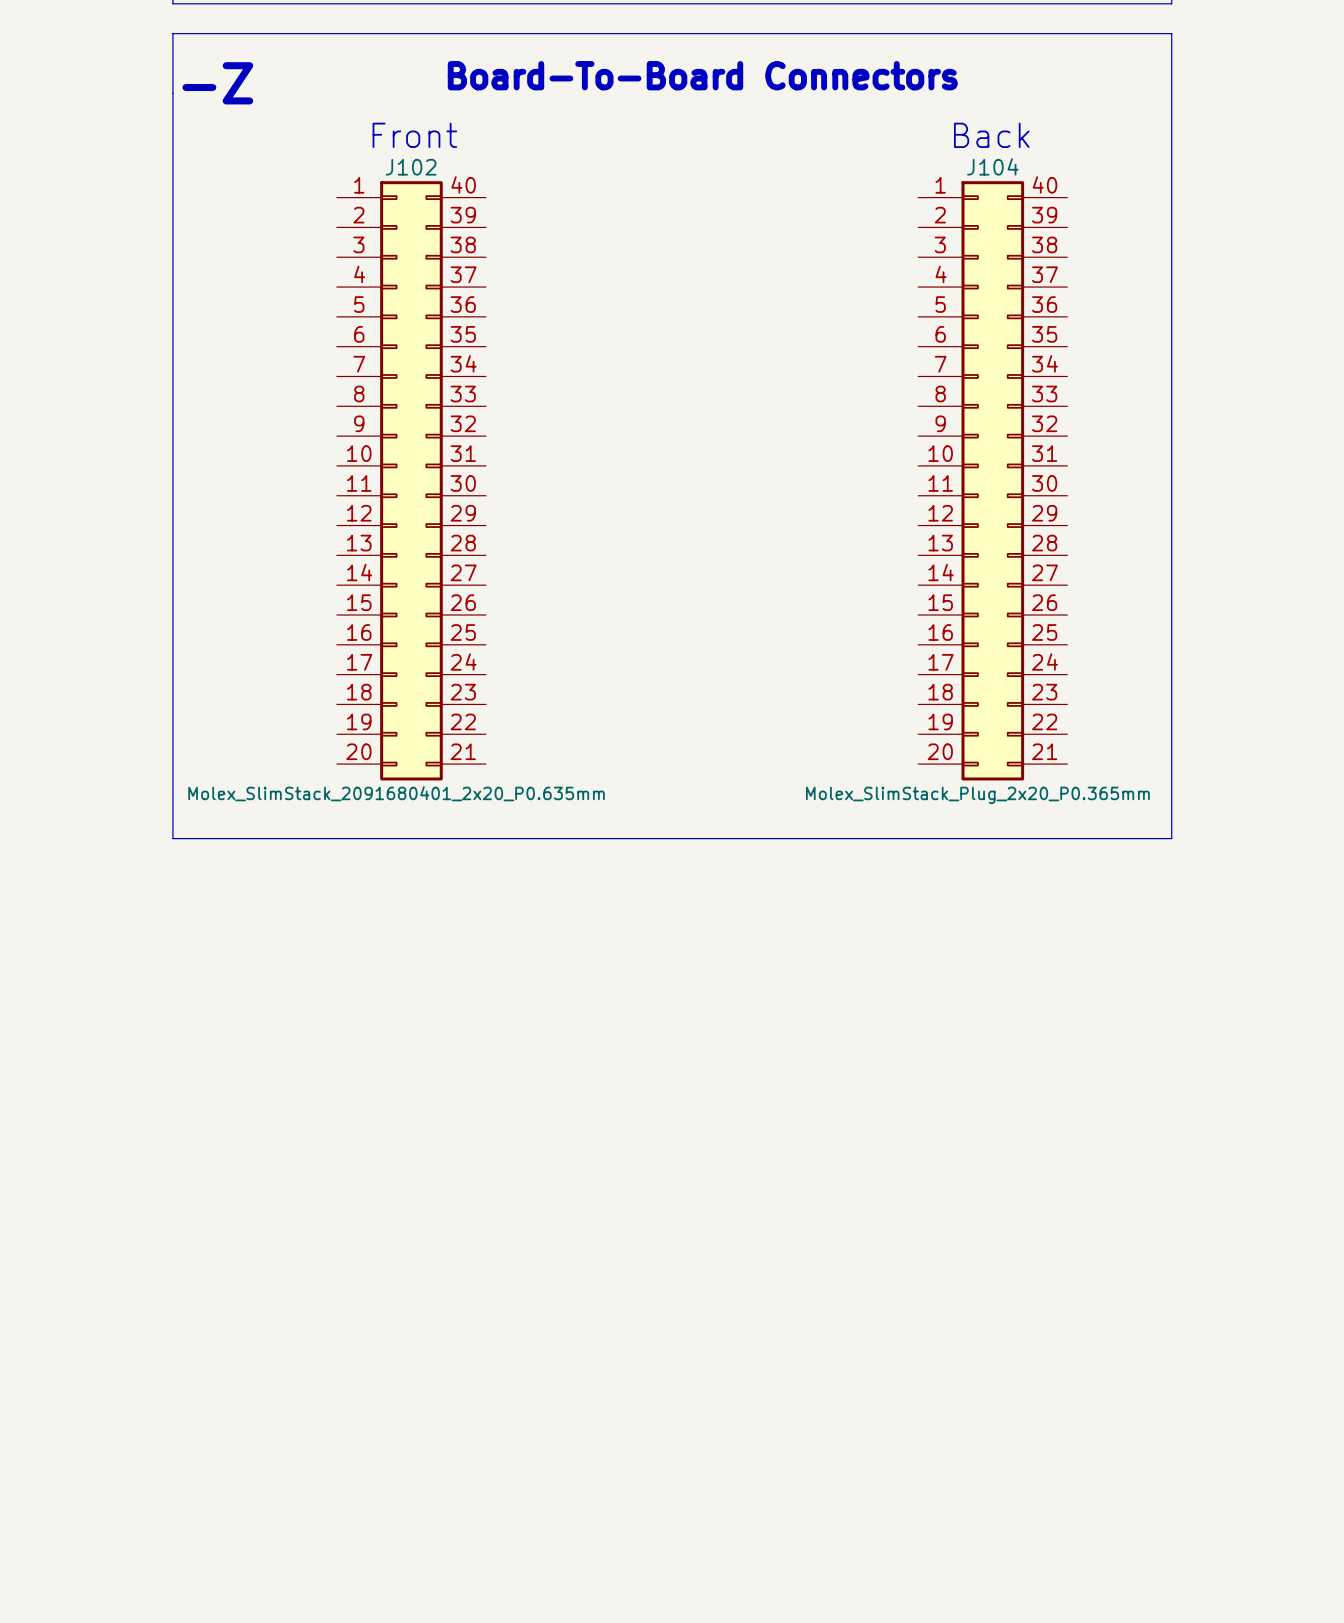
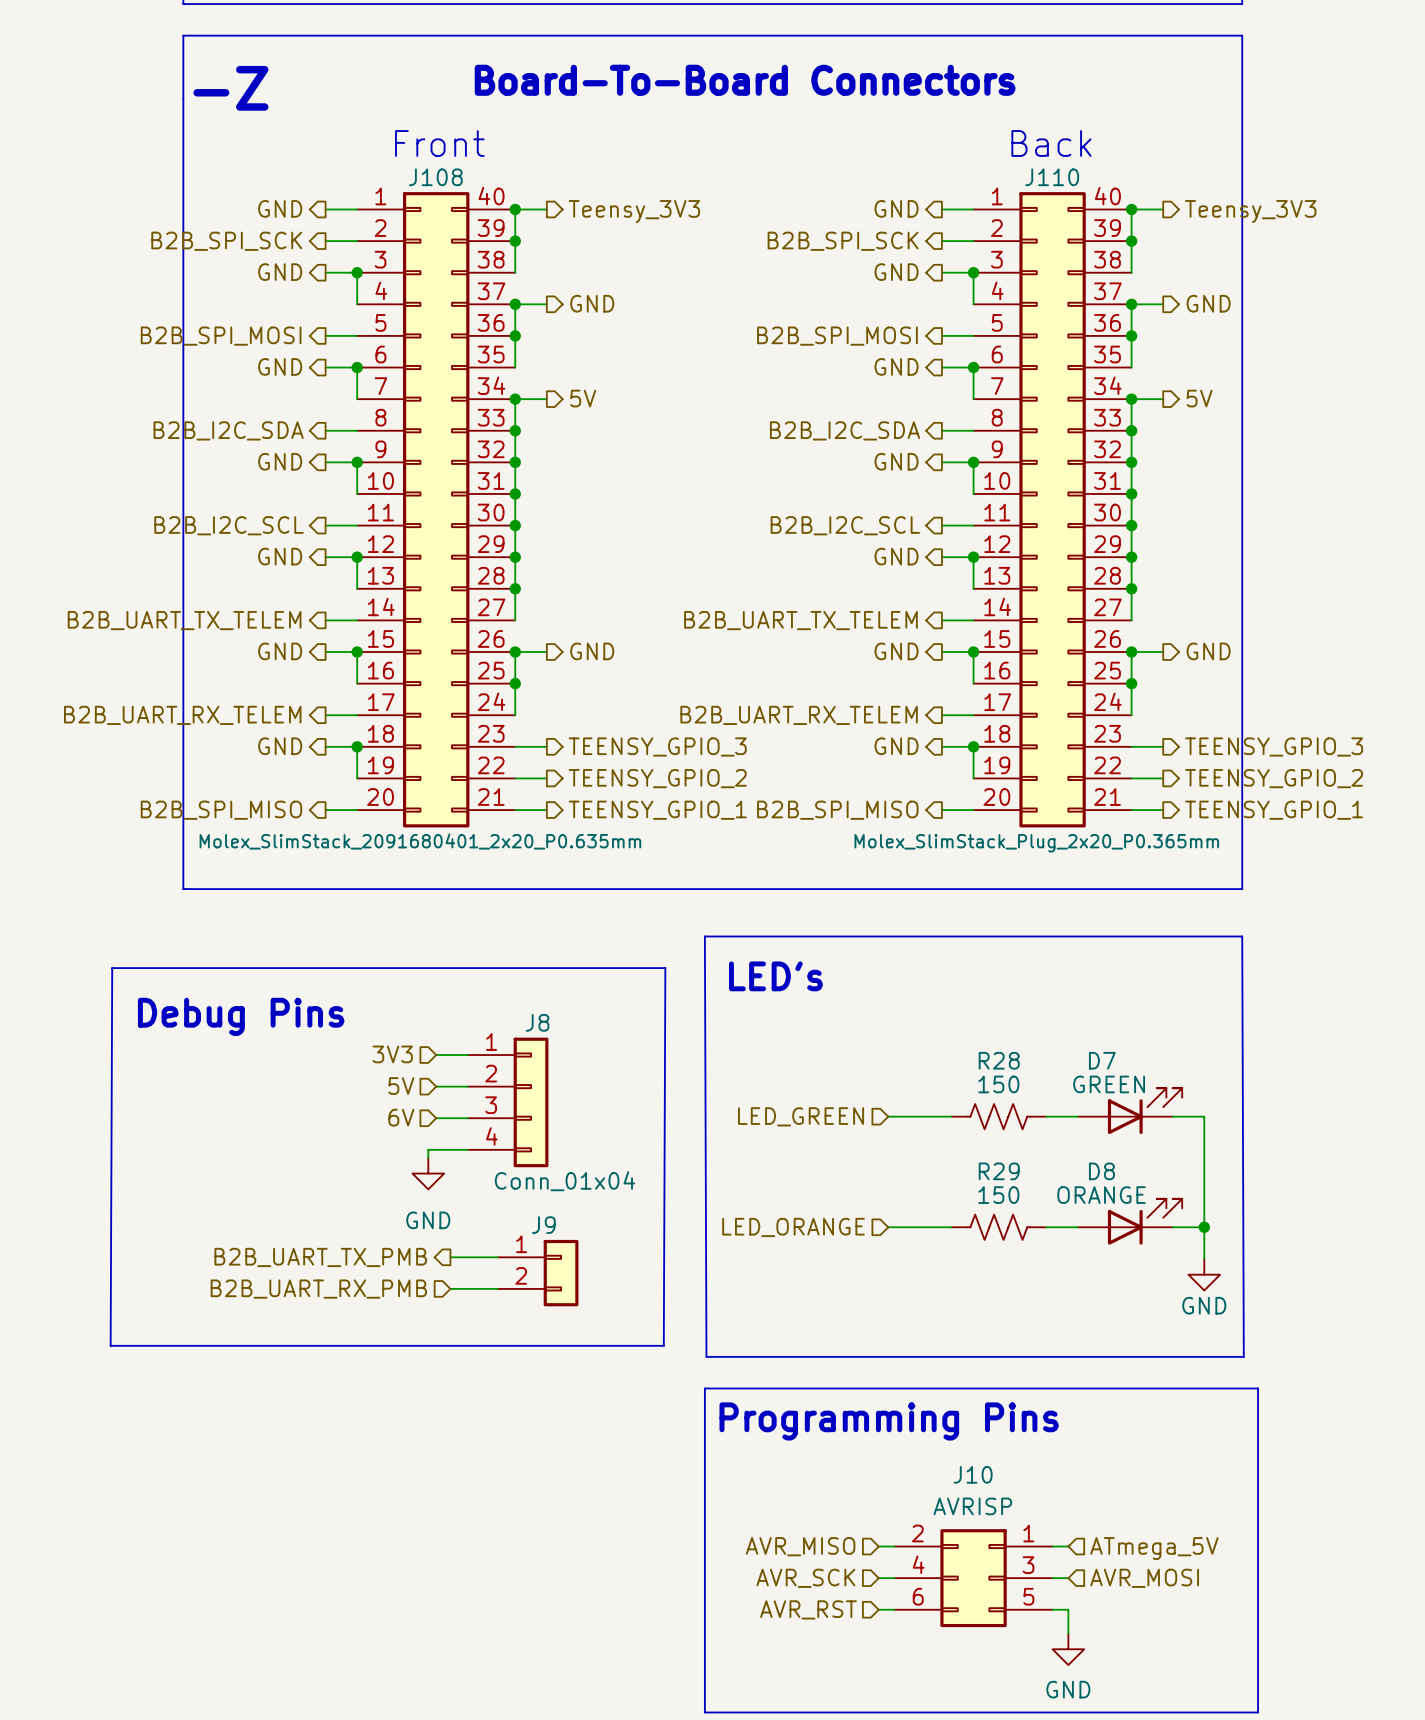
J104 name: J104 (992, 166) -> J110 (1052, 177)
J102 name: J102 (411, 167) -> J108 (435, 177)
hierarchical label: none -> GND (280, 208)
wire: none -> (325, 209) (357, 209)
junction: none -> (515, 209)
wire: none -> (546, 209) (515, 209) (515, 272)
hierarchical label: none -> GND (896, 208)
wire: none -> (941, 209) (973, 209)
junction: none -> (1131, 209)
wire: none -> (1163, 209) (1131, 209) (1131, 272)
hierarchical label: none -> Teensy_3V3 (634, 211)
hierarchical label: none -> Teensy_3V3 (1250, 211)
hierarchical label: none -> B2B_SPI_SCK (226, 241)
wire: none -> (325, 241) (357, 241)
junction: none -> (515, 241)
hierarchical label: none -> B2B_SPI_SCK (843, 241)
wire: none -> (941, 241) (973, 241)
junction: none -> (1131, 241)
hierarchical label: none -> GND (280, 272)
hierarchical label: none -> GND (896, 272)
wire: none -> (325, 272) (357, 272) (357, 304)
junction: none -> (357, 272)
wire: none -> (941, 272) (973, 272) (973, 304)
junction: none -> (973, 272)
hierarchical label: none -> GND (592, 303)
hierarchical label: none -> GND (1208, 303)
junction: none -> (515, 304)
wire: none -> (546, 304) (515, 304) (515, 367)
junction: none -> (1131, 304)
wire: none -> (1163, 304) (1131, 304) (1131, 367)
wire: none -> (325, 335) (357, 335)
junction: none -> (515, 335)
wire: none -> (941, 335) (973, 335)
junction: none -> (1131, 335)
hierarchical label: none -> B2B_SPI_MOSI (221, 336)
hierarchical label: none -> B2B_SPI_MOSI (837, 336)
hierarchical label: none -> GND (280, 366)
wire: none -> (325, 367) (357, 367) (357, 399)
junction: none -> (357, 367)
hierarchical label: none -> GND (896, 366)
wire: none -> (941, 367) (973, 367) (973, 399)
junction: none -> (973, 367)
hierarchical label: none -> 5V (583, 398)
hierarchical label: none -> 5V (1199, 398)
junction: none -> (515, 399)
wire: none -> (546, 399) (515, 399) (515, 620)
junction: none -> (1131, 399)
wire: none -> (1163, 399) (1131, 399) (1131, 620)
hierarchical label: none -> B2B_I2C_SDA (228, 430)
wire: none -> (325, 430) (357, 430)
junction: none -> (515, 430)
hierarchical label: none -> B2B_I2C_SDA (845, 430)
wire: none -> (941, 430) (973, 430)
junction: none -> (1131, 430)
hierarchical label: none -> GND (280, 461)
hierarchical label: none -> GND (896, 461)
wire: none -> (325, 462) (357, 462) (357, 493)
junction: none -> (357, 462)
junction: none -> (515, 462)
wire: none -> (941, 462) (973, 462) (973, 493)
junction: none -> (973, 462)
junction: none -> (1131, 462)
junction: none -> (515, 493)
junction: none -> (1131, 493)
hierarchical label: none -> B2B_I2C_SCL (229, 525)
wire: none -> (325, 525) (357, 525)
junction: none -> (515, 525)
hierarchical label: none -> B2B_I2C_SCL (845, 525)
wire: none -> (941, 525) (973, 525)
junction: none -> (1131, 525)
hierarchical label: none -> GND (280, 556)
hierarchical label: none -> GND (896, 556)
wire: none -> (325, 557) (357, 557) (357, 588)
junction: none -> (357, 557)
junction: none -> (515, 557)
wire: none -> (941, 557) (973, 557) (973, 588)
junction: none -> (973, 557)
junction: none -> (1131, 557)
junction: none -> (515, 588)
junction: none -> (1131, 588)
hierarchical label: none -> B2B_UART_TX_TELEM (184, 620)
wire: none -> (325, 620) (357, 620)
hierarchical label: none -> B2B_UART_TX_TELEM (800, 620)
wire: none -> (941, 620) (973, 620)
hierarchical label: none -> GND (280, 651)
wire: none -> (325, 652) (357, 652) (357, 683)
junction: none -> (357, 652)
junction: none -> (515, 652)
wire: none -> (546, 652) (515, 652) (515, 715)
hierarchical label: none -> GND (592, 651)
hierarchical label: none -> GND (896, 651)
wire: none -> (941, 652) (973, 652) (973, 683)
junction: none -> (973, 652)
junction: none -> (1131, 652)
wire: none -> (1163, 652) (1131, 652) (1131, 715)
hierarchical label: none -> GND (1208, 651)
junction: none -> (515, 683)
junction: none -> (1131, 683)
hierarchical label: none -> B2B_UART_RX_TELEM (182, 715)
wire: none -> (325, 715) (357, 715)
hierarchical label: none -> B2B_UART_RX_TELEM (799, 715)
wire: none -> (941, 715) (973, 715)
hierarchical label: none -> GND (280, 746)
hierarchical label: none -> GND (896, 746)
wire: none -> (325, 746) (357, 746) (357, 778)
junction: none -> (357, 746)
wire: none -> (515, 746) (546, 746)
hierarchical label: none -> TEENSY_GPIO_3 (657, 747)
wire: none -> (941, 746) (973, 746) (973, 778)
junction: none -> (973, 746)
wire: none -> (1131, 746) (1163, 746)
hierarchical label: none -> TEENSY_GPIO_3 (1274, 747)
wire: none -> (515, 778) (546, 778)
hierarchical label: none -> TEENSY_GPIO_2 (657, 778)
wire: none -> (1131, 778) (1163, 778)
hierarchical label: none -> TEENSY_GPIO_2 (1274, 778)
hierarchical label: none -> B2B_SPI_MISO (221, 810)
wire: none -> (325, 810) (357, 810)
wire: none -> (515, 810) (546, 810)
hierarchical label: none -> TEENSY_GPIO_1 (657, 810)
hierarchical label: none -> B2B_SPI_MISO (837, 810)
wire: none -> (941, 810) (973, 810)
wire: none -> (1131, 810) (1163, 810)
hierarchical label: none -> TEENSY_GPIO_1 (1274, 810)
line: none -> (704, 936) (706, 1356) (1243, 1356) (1242, 936) (704, 936)
line: none -> (112, 968) (665, 968) (663, 1345) (110, 1345) (112, 968)
text: none -> LED's (775, 976)
text: none -> Debug Pins (241, 1016)
hierarchical label: none -> 3V3 (392, 1054)
wire: none -> (436, 1055) (467, 1055)
hierarchical label: none -> 5V (401, 1086)
wire: none -> (436, 1086) (467, 1086)
J8: none -> Conn_01x04 (508, 1102)
D7: none -> GREEN (1130, 1111)
hierarchical label: none -> LED_GREEN (801, 1116)
wire: none -> (888, 1116) (951, 1116)
R28: none -> 150 (998, 1116)
wire: none -> (1046, 1116) (1077, 1116)
wire: none -> (1172, 1116) (1204, 1116) (1204, 1258)
hierarchical label: none -> 6V (401, 1117)
wire: none -> (436, 1118) (467, 1118)
wire: none -> (467, 1149) (428, 1149) (428, 1157)
power symbol: none -> GND (428, 1173)
D8: none -> ORANGE (1130, 1221)
hierarchical label: none -> LED_ORANGE (793, 1227)
wire: none -> (888, 1227) (951, 1227)
R29: none -> 150 (998, 1227)
wire: none -> (1046, 1227) (1077, 1227)
wire: none -> (1172, 1227) (1204, 1227)
junction: none -> (1204, 1227)
wire: none -> (450, 1257) (497, 1257)
hierarchical label: none -> B2B_UART_TX_PMB (320, 1257)
J9: none -> (538, 1273)
power symbol: none -> GND (1204, 1274)
hierarchical label: none -> B2B_UART_RX_PMB (318, 1289)
wire: none -> (450, 1288) (497, 1288)
line: none -> (704, 1388) (1258, 1388) (1258, 1712) (704, 1712) (704, 1388)
text: none -> Programming Pins (889, 1421)
hierarchical label: none -> AVR_MISO (800, 1546)
wire: none -> (878, 1546) (894, 1546)
wire: none -> (1052, 1546) (1068, 1546)
hierarchical label: none -> ATmega_5V (1154, 1548)
hierarchical label: none -> AVR_SCK (805, 1578)
wire: none -> (878, 1578) (894, 1578)
J10: none -> AVRISP (973, 1578)
wire: none -> (1052, 1578) (1068, 1578)
hierarchical label: none -> AVR_MOSI (1144, 1578)
hierarchical label: none -> AVR_RST (808, 1609)
wire: none -> (878, 1609) (894, 1609)
wire: none -> (1052, 1609) (1068, 1609) (1068, 1633)
power symbol: none -> GND (1068, 1649)

